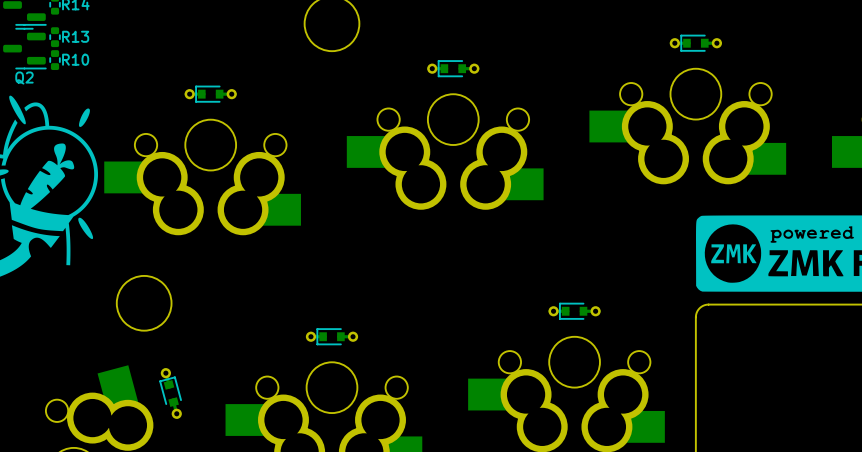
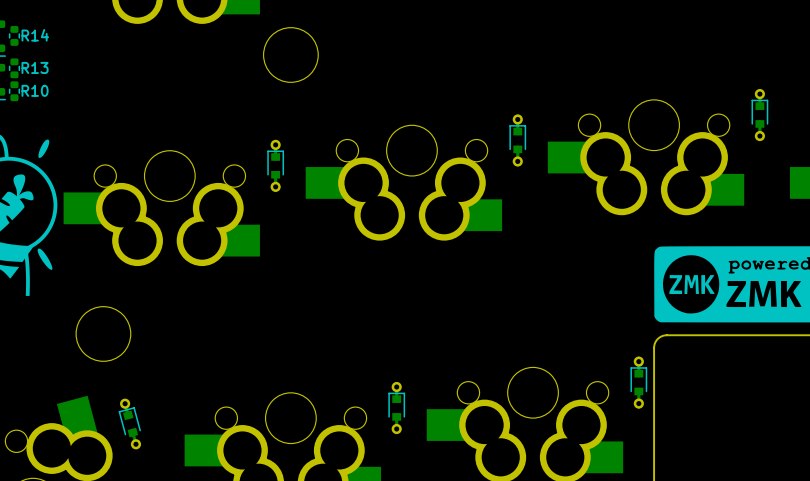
part: (695, 43) -> none
part: (453, 68) -> none
part: none -> (759, 115)
part: (210, 94) -> none
part: none -> (517, 140)
part: none -> (275, 165)
part: (574, 311) -> none
part: (331, 336) -> none
part: none -> (638, 382)
part: none -> (396, 408)

